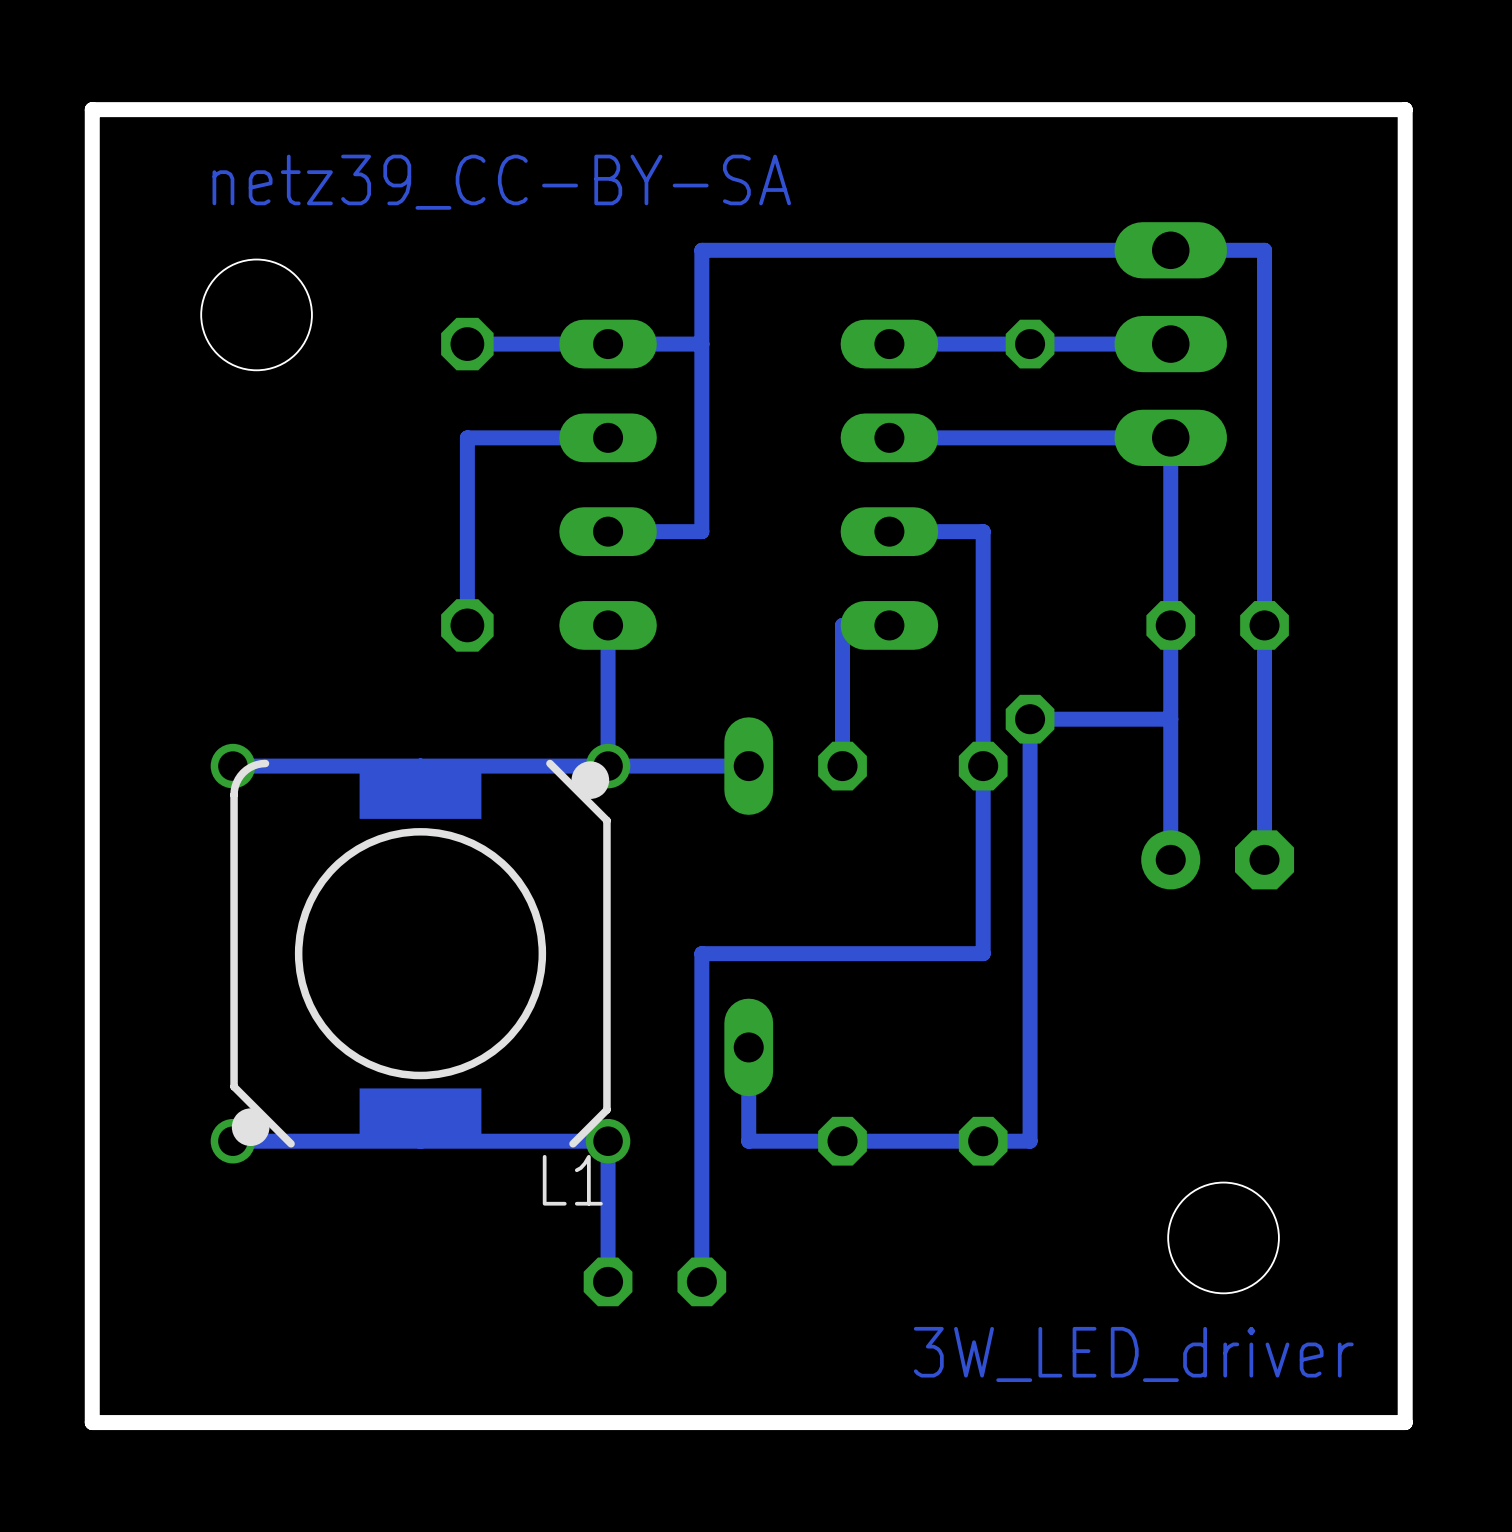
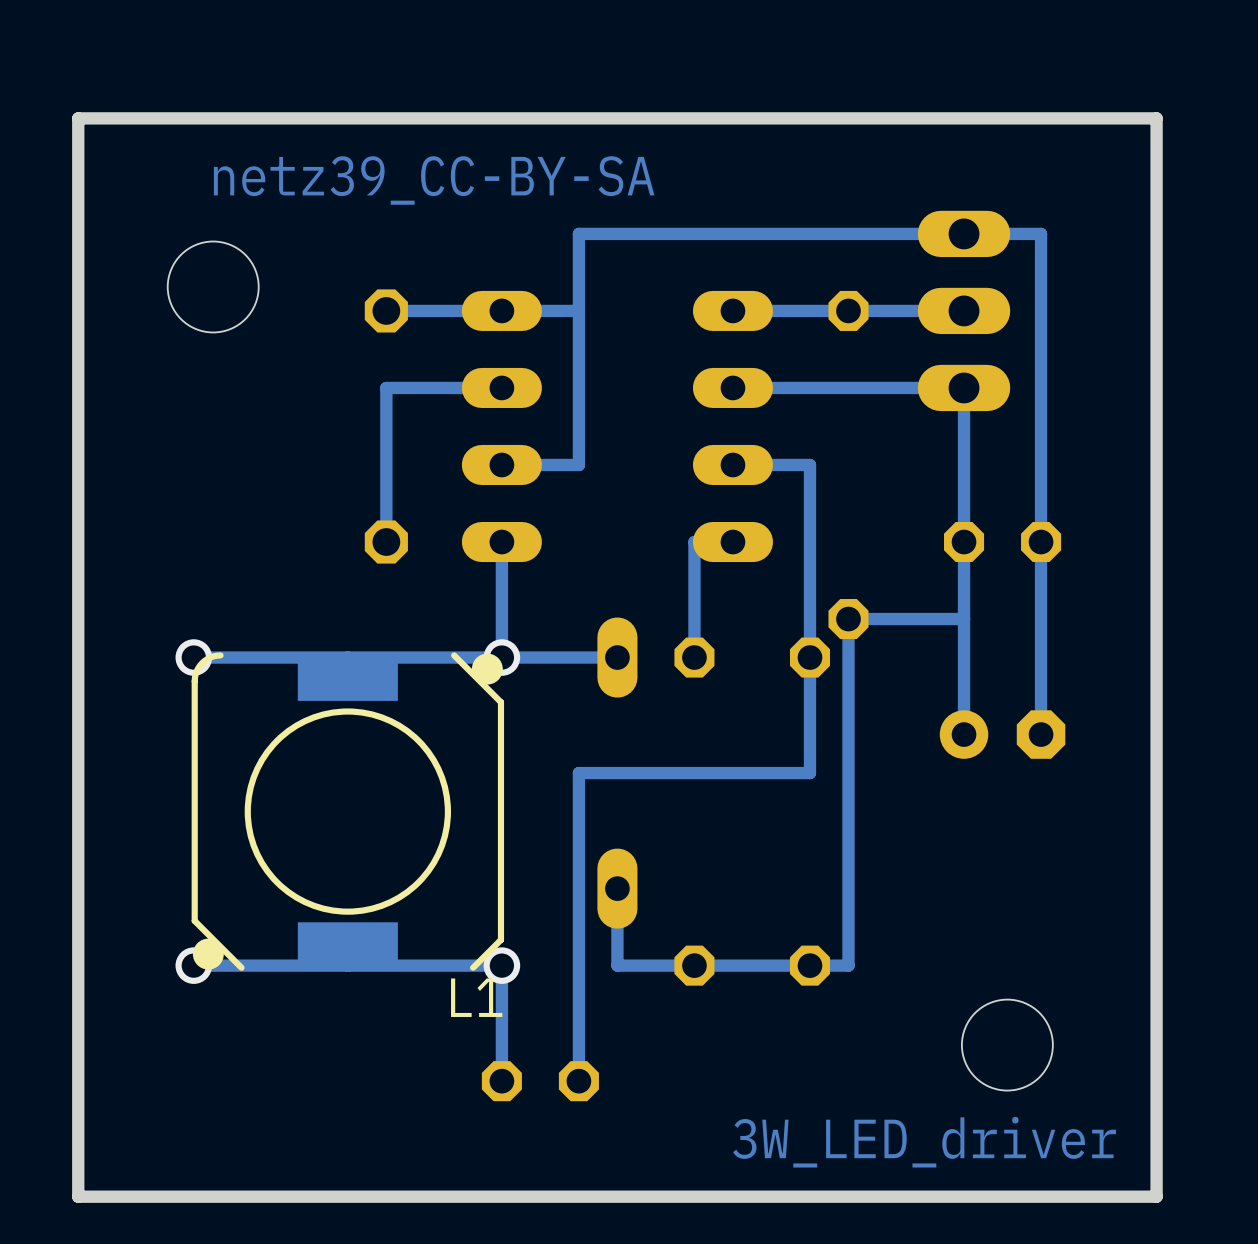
bottom track: (983, 906) (983, 953) (701, 953) -> (809, 773) (578, 773) (578, 811)

